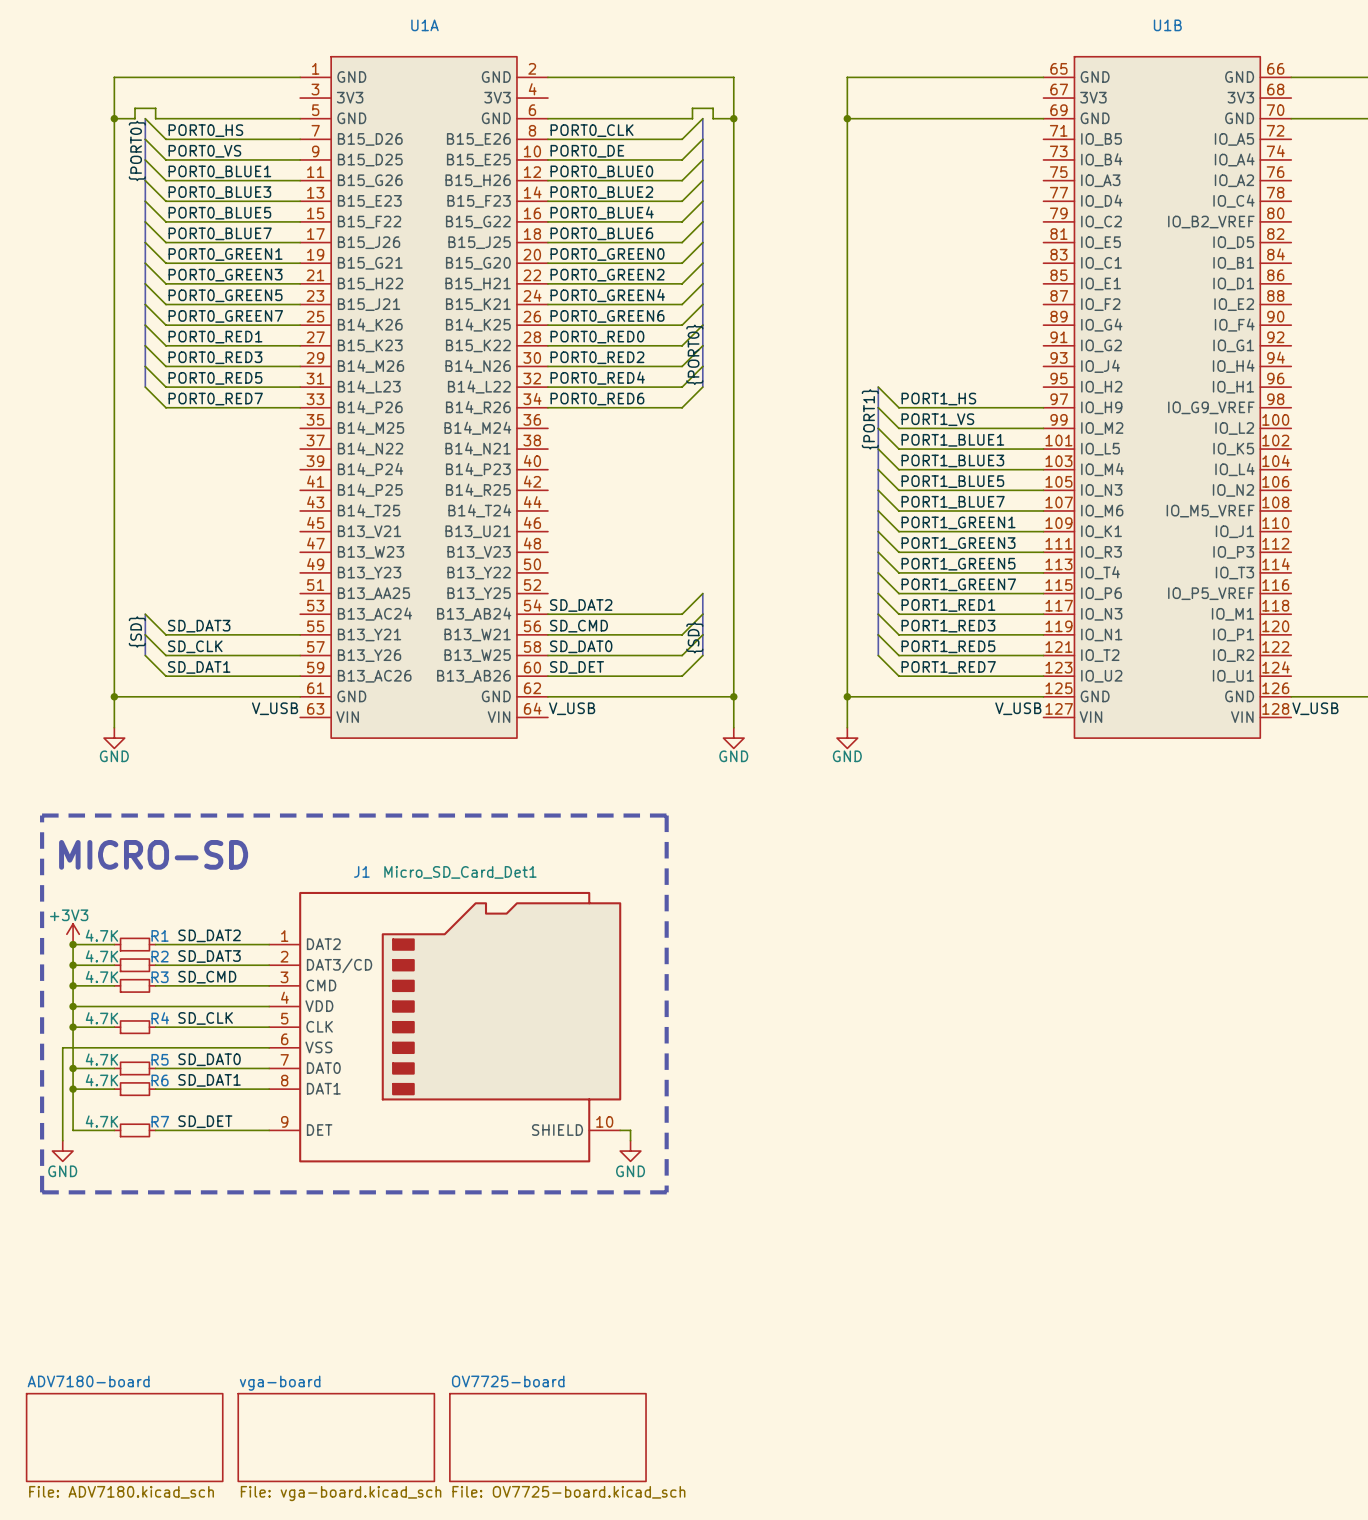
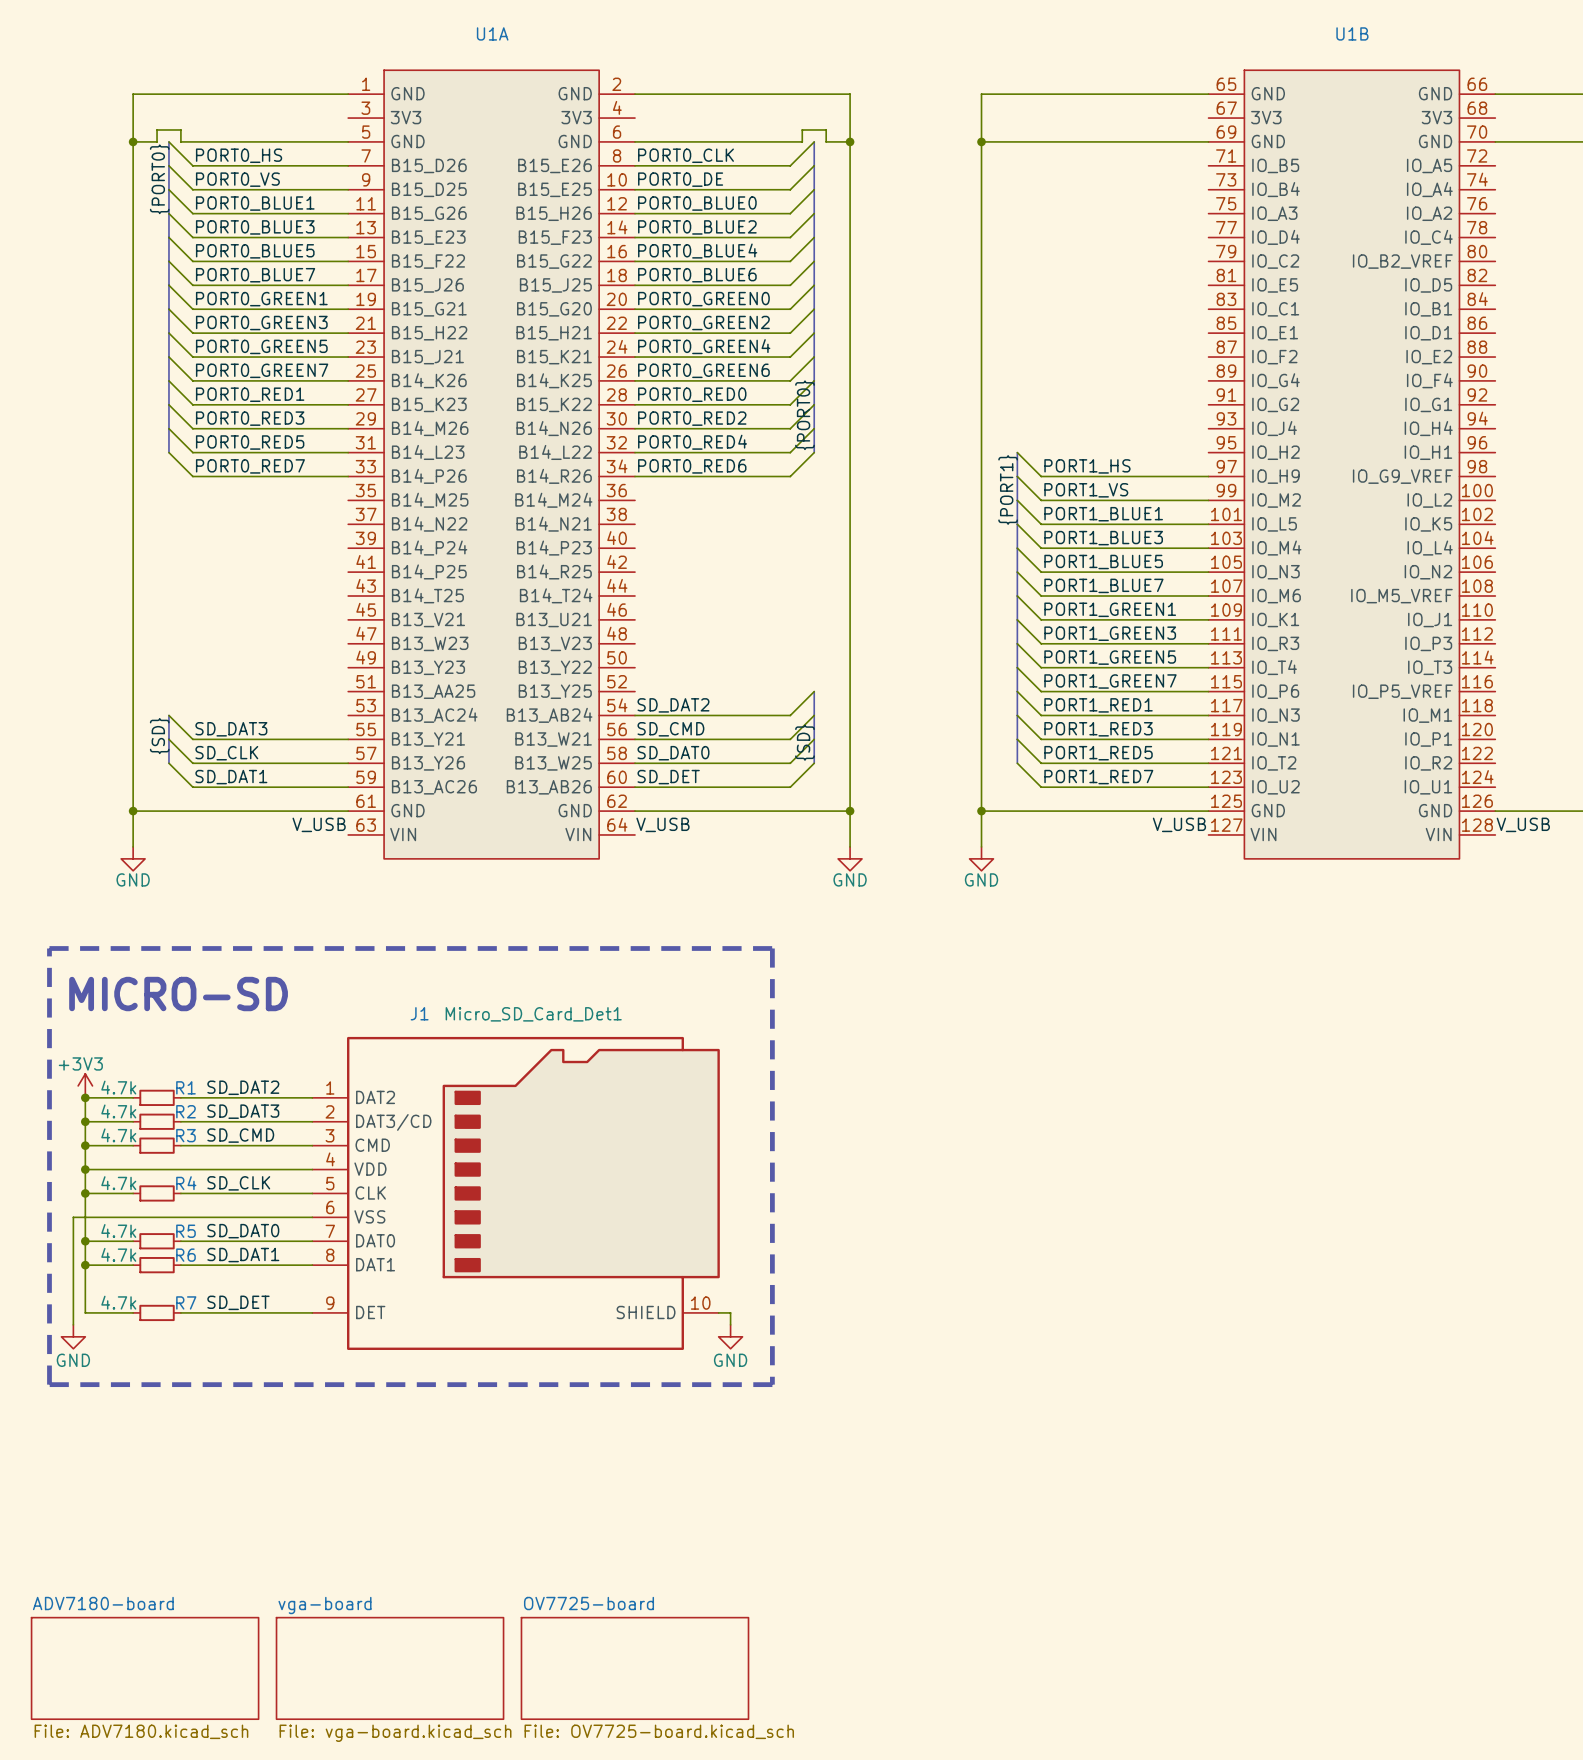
R1 value: 4.7K (101, 935) -> 4.7k (118, 1087)
R2 value: 4.7K (101, 956) -> 4.7k (118, 1111)
R3 value: 4.7K (101, 976) -> 4.7k (118, 1135)
R4 value: 4.7K (101, 1018) -> 4.7k (118, 1183)
R5 value: 4.7K (101, 1059) -> 4.7k (118, 1230)
R6 value: 4.7K (101, 1080) -> 4.7k (118, 1254)
R7 value: 4.7K (101, 1121) -> 4.7k (118, 1302)

